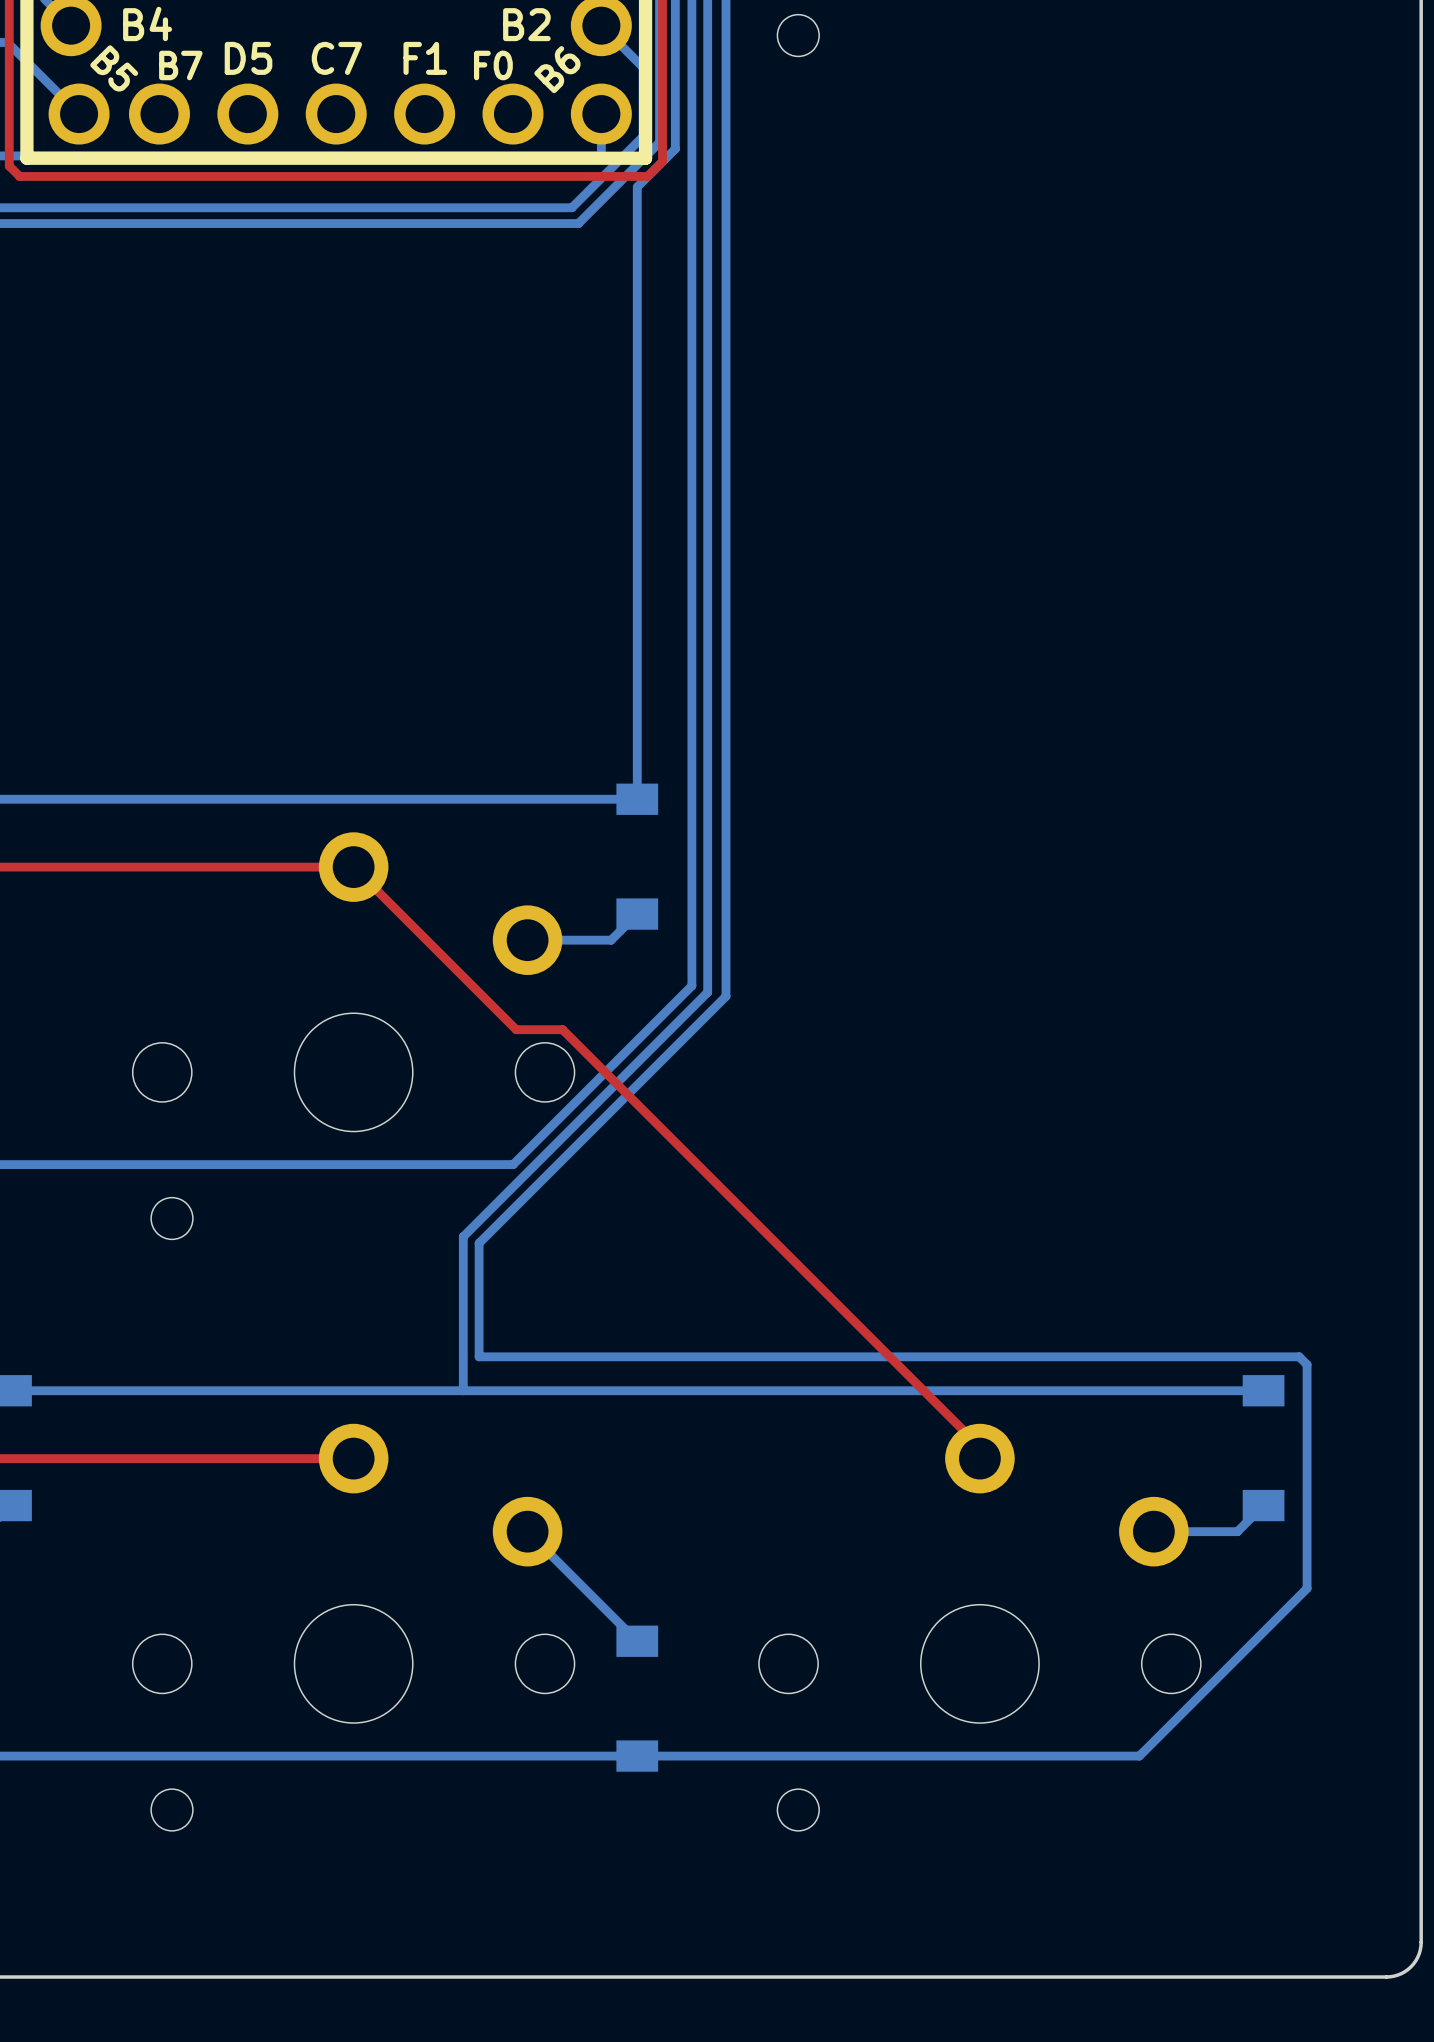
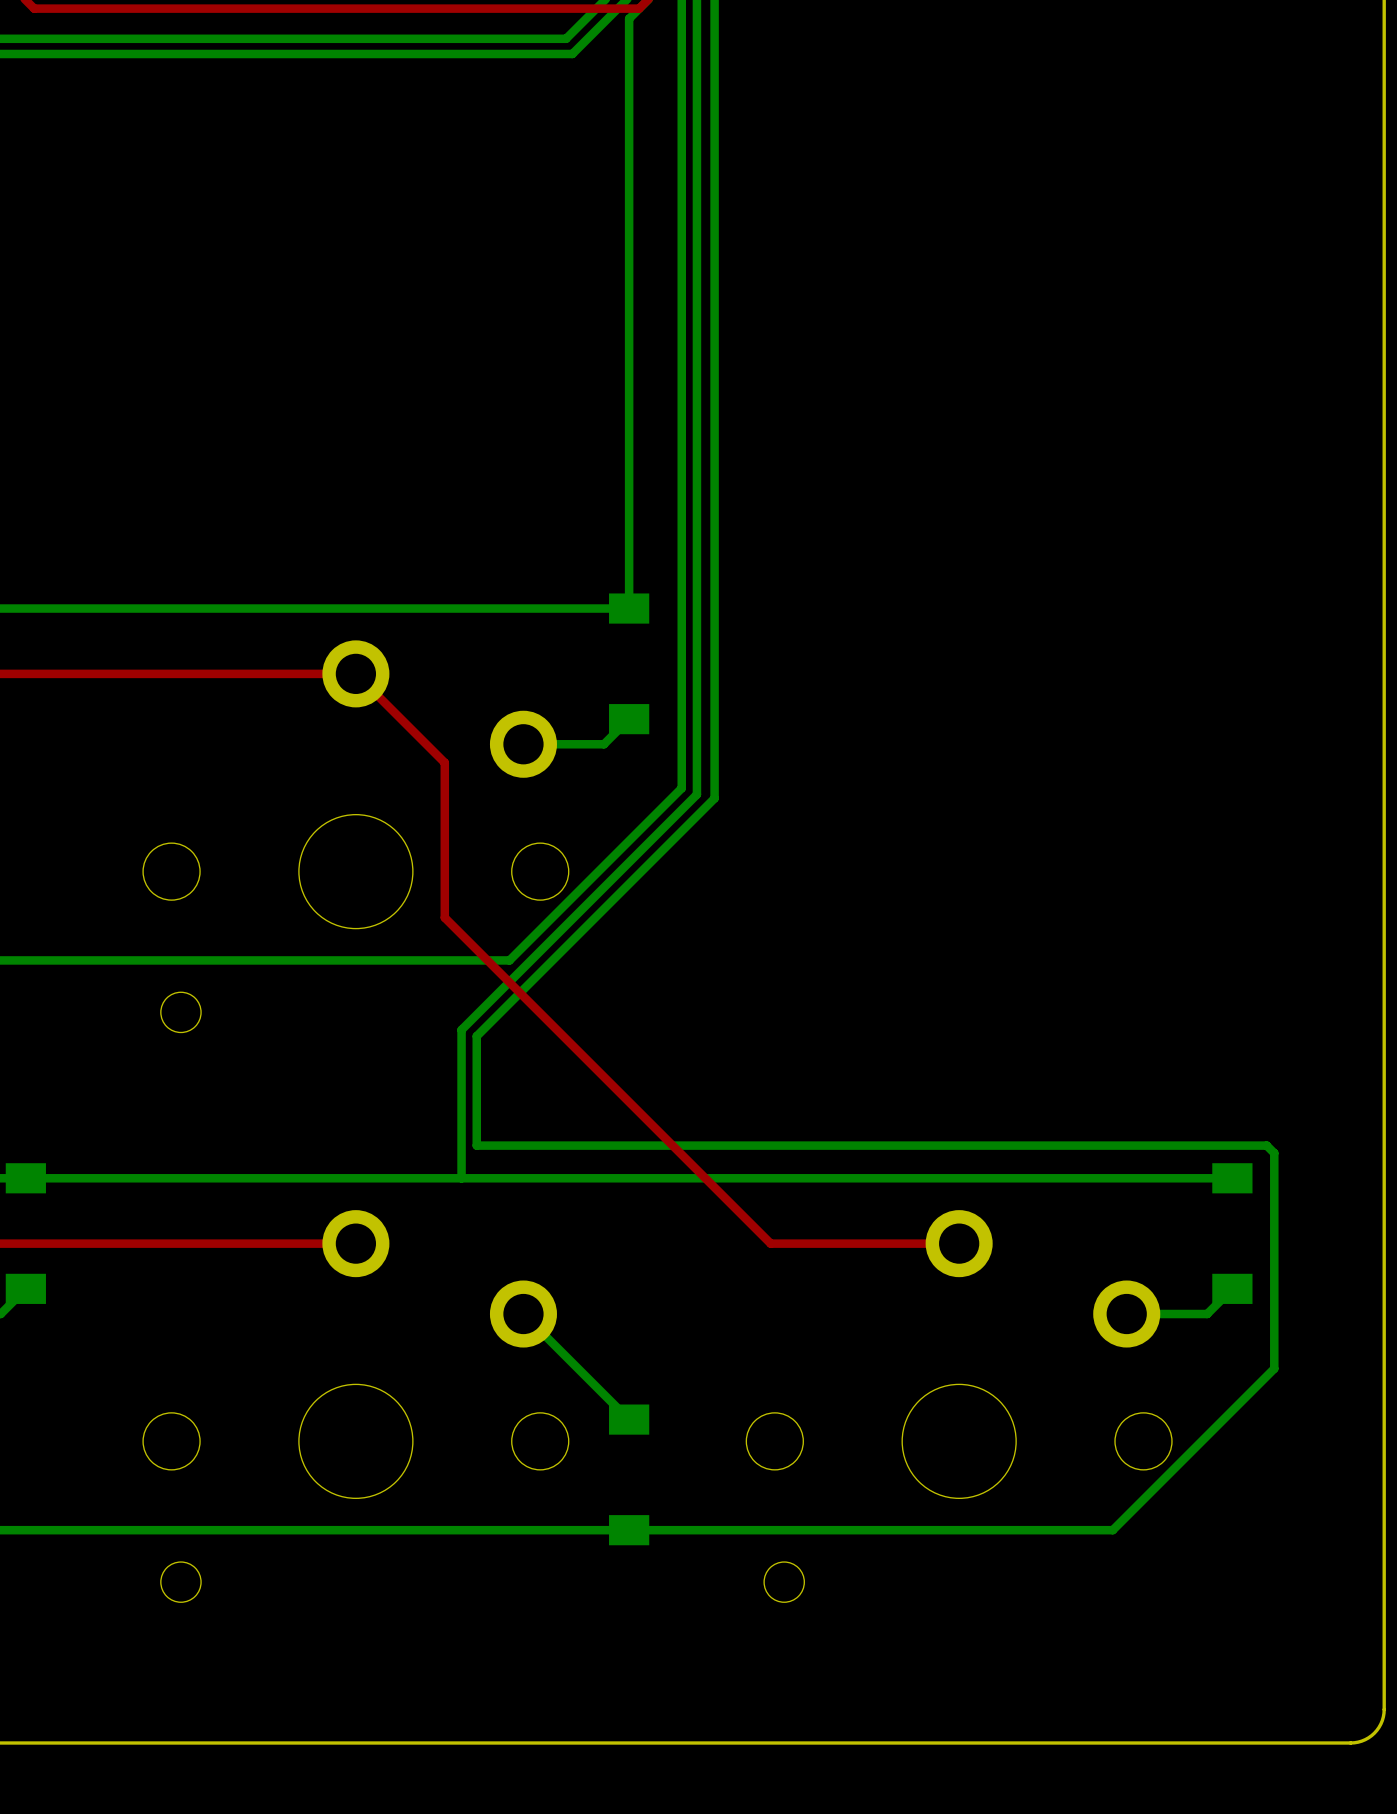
top track: (445, 959) (516, 1029) (562, 1029) (979, 1446) (979, 1458) -> (444, 762) (444, 917) (770, 1243) (959, 1243)

